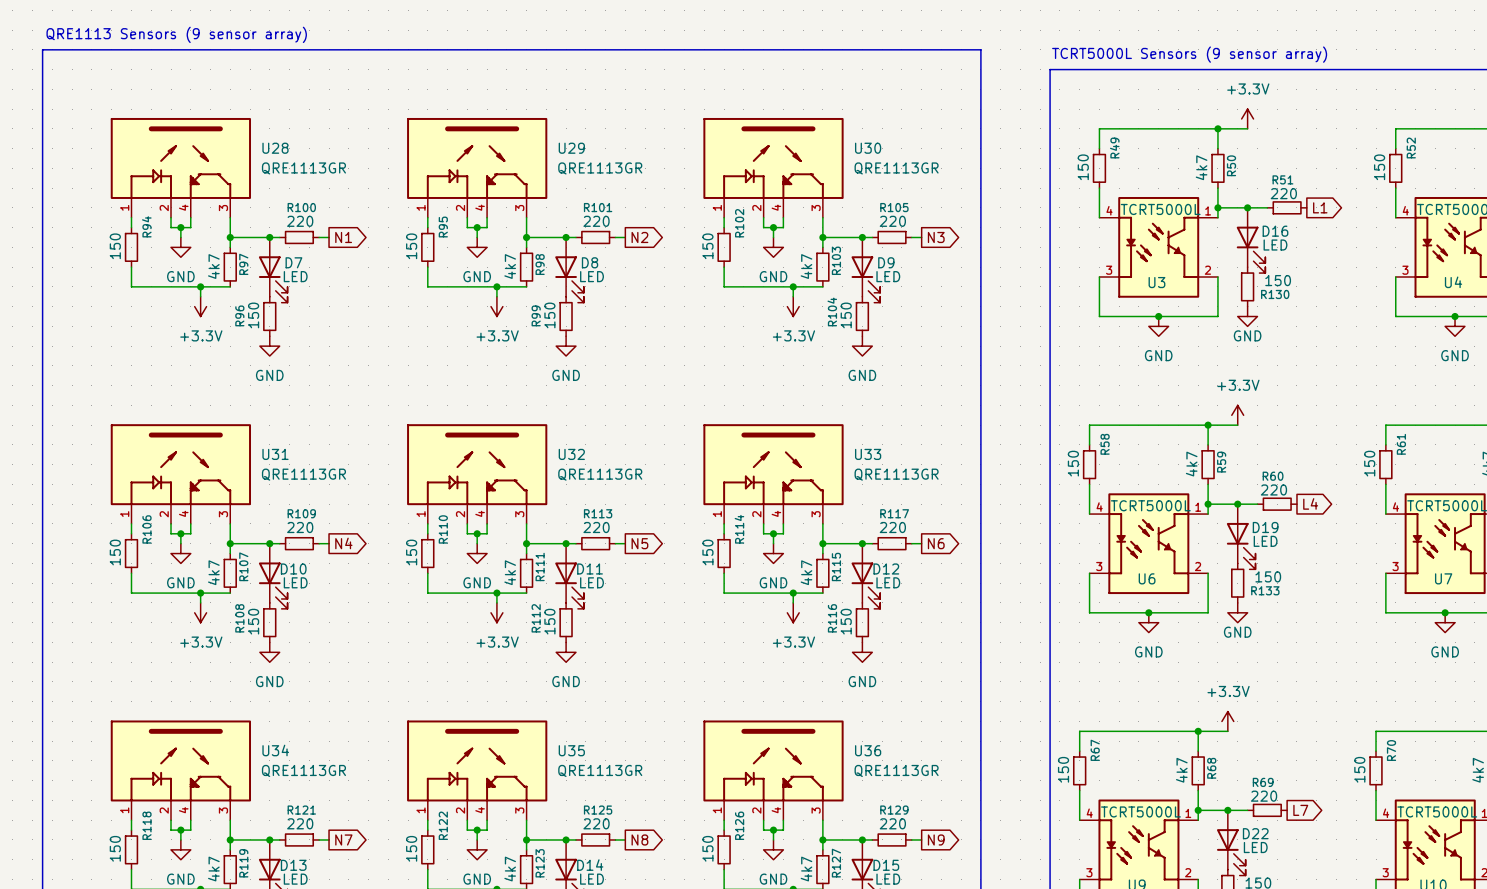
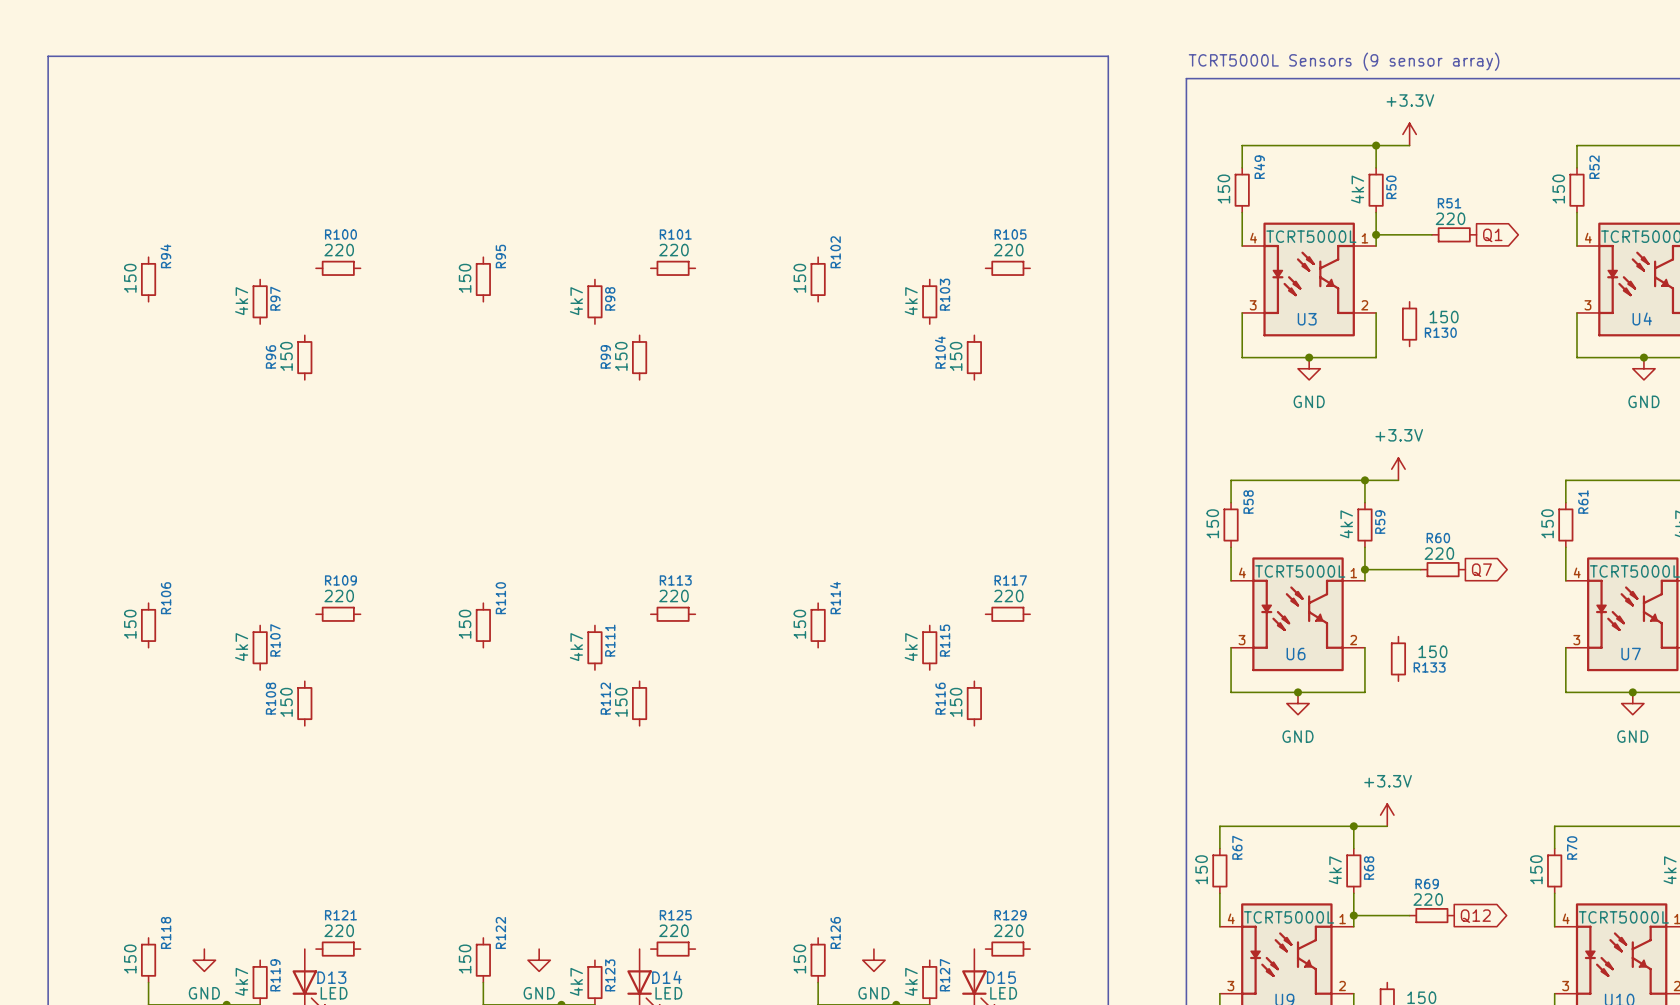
text: QRE1113 Sensors (9 sensor array) (176, 34) -> none
U28: QRE1113GR (180, 167) -> none
U29: QRE1113GR (477, 167) -> none
U30: QRE1113GR (773, 167) -> none
junction: (1247, 207) -> none
global label: L1 (1320, 207) -> Q1 (1492, 235)
wire: (131, 217) (131, 227) -> none
wire: (171, 217) (171, 227) (190, 227) (190, 217) -> none
wire: (230, 217) (230, 247) -> none
wire: (427, 217) (427, 227) -> none
wire: (467, 217) (467, 227) (487, 227) (487, 217) -> none
wire: (526, 217) (526, 247) -> none
wire: (724, 217) (724, 227) -> none
wire: (763, 217) (763, 227) (783, 227) (783, 217) -> none
wire: (822, 217) (822, 247) -> none
wire: (180, 227) (180, 237) -> none
junction: (180, 227) -> none
wire: (477, 227) (477, 237) -> none
junction: (477, 227) -> none
wire: (773, 227) (773, 237) -> none
junction: (773, 227) -> none
wire: (230, 237) (279, 237) -> none
junction: (230, 237) -> none
junction: (269, 237) -> none
wire: (319, 237) (329, 237) -> none
global label: N1 (343, 237) -> none
wire: (526, 237) (575, 237) -> none
junction: (526, 237) -> none
junction: (566, 237) -> none
wire: (615, 237) (625, 237) -> none
global label: N2 (639, 237) -> none
wire: (822, 237) (872, 237) -> none
junction: (822, 237) -> none
junction: (862, 237) -> none
wire: (911, 237) (921, 237) -> none
global label: N3 (936, 237) -> none
D16: LED (1251, 240) -> none
power symbol: GND (180, 247) -> none
power symbol: GND (477, 247) -> none
power symbol: GND (773, 247) -> none
wire: (131, 267) (131, 286) (230, 286) -> none
wire: (427, 267) (427, 286) (526, 286) -> none
wire: (724, 267) (724, 286) (822, 286) -> none
D7: LED (273, 270) -> none
D8: LED (569, 270) -> none
D9: LED (865, 270) -> none
wire: (200, 286) (200, 296) -> none
junction: (200, 286) -> none
wire: (496, 286) (496, 296) -> none
junction: (496, 286) -> none
wire: (793, 286) (793, 296) -> none
junction: (793, 286) -> none
power symbol: +3.3V (200, 306) -> none
power symbol: +3.3V (496, 306) -> none
power symbol: +3.3V (793, 306) -> none
power symbol: GND (1247, 316) -> none
power symbol: GND (269, 346) -> none
power symbol: GND (566, 346) -> none
power symbol: GND (862, 346) -> none
U31: QRE1113GR (180, 474) -> none
U32: QRE1113GR (477, 474) -> none
U33: QRE1113GR (773, 474) -> none
global label: L4 (1310, 503) -> Q7 (1481, 570)
junction: (1237, 504) -> none
wire: (131, 523) (131, 533) -> none
wire: (171, 523) (171, 533) (190, 533) (190, 523) -> none
wire: (230, 523) (230, 553) -> none
wire: (427, 523) (427, 533) -> none
wire: (467, 523) (467, 533) (487, 533) (487, 523) -> none
wire: (526, 523) (526, 553) -> none
wire: (724, 523) (724, 533) -> none
wire: (763, 523) (763, 533) (783, 533) (783, 523) -> none
wire: (822, 523) (822, 553) -> none
wire: (180, 533) (180, 543) -> none
junction: (180, 533) -> none
wire: (477, 533) (477, 543) -> none
junction: (477, 533) -> none
wire: (773, 533) (773, 543) -> none
junction: (773, 533) -> none
D19: LED (1241, 536) -> none
wire: (230, 543) (279, 543) -> none
junction: (230, 543) -> none
junction: (269, 543) -> none
wire: (319, 543) (329, 543) -> none
global label: N4 (343, 543) -> none
wire: (526, 543) (575, 543) -> none
junction: (526, 543) -> none
junction: (566, 543) -> none
wire: (615, 543) (625, 543) -> none
global label: N5 (639, 543) -> none
wire: (822, 543) (872, 543) -> none
junction: (822, 543) -> none
junction: (862, 543) -> none
wire: (911, 543) (921, 543) -> none
global label: N6 (936, 543) -> none
power symbol: GND (180, 553) -> none
power symbol: GND (477, 553) -> none
power symbol: GND (773, 553) -> none
wire: (131, 573) (131, 593) (230, 593) -> none
wire: (427, 573) (427, 593) (526, 593) -> none
wire: (724, 573) (724, 593) (822, 593) -> none
D10: LED (273, 576) -> none
D11: LED (569, 576) -> none
D12: LED (865, 576) -> none
wire: (200, 593) (200, 602) -> none
junction: (200, 593) -> none
wire: (496, 593) (496, 602) -> none
junction: (496, 593) -> none
wire: (793, 593) (793, 602) -> none
junction: (793, 593) -> none
power symbol: +3.3V (200, 612) -> none
power symbol: +3.3V (496, 612) -> none
power symbol: +3.3V (793, 612) -> none
power symbol: GND (1237, 612) -> none
power symbol: GND (269, 652) -> none
power symbol: GND (566, 652) -> none
power symbol: GND (862, 652) -> none
U34: QRE1113GR (180, 770) -> none
U35: QRE1113GR (477, 770) -> none
U36: QRE1113GR (773, 770) -> none
junction: (1227, 810) -> none
global label: L7 (1300, 810) -> Q12 (1475, 916)
wire: (131, 820) (131, 830) -> none
wire: (171, 820) (171, 830) (190, 830) (190, 820) -> none
wire: (230, 820) (230, 849) -> none
wire: (427, 820) (427, 830) -> none
wire: (467, 820) (467, 830) (487, 830) (487, 820) -> none
wire: (526, 820) (526, 849) -> none
wire: (724, 820) (724, 830) -> none
wire: (763, 820) (763, 830) (783, 830) (783, 820) -> none
wire: (822, 820) (822, 849) -> none
wire: (180, 830) (180, 839) -> none
junction: (180, 830) -> none
wire: (477, 830) (477, 839) -> none
junction: (477, 830) -> none
wire: (773, 830) (773, 839) -> none
junction: (773, 830) -> none
wire: (230, 839) (279, 839) -> none
junction: (230, 839) -> none
junction: (269, 839) -> none
wire: (319, 839) (329, 839) -> none
global label: N7 (343, 839) -> none
wire: (526, 839) (575, 839) -> none
junction: (526, 839) -> none
junction: (566, 839) -> none
wire: (615, 839) (625, 839) -> none
global label: N8 (639, 839) -> none
wire: (822, 839) (872, 839) -> none
junction: (822, 839) -> none
junction: (862, 839) -> none
wire: (911, 839) (921, 839) -> none
global label: N9 (936, 839) -> none
D22: LED (1231, 842) -> none

